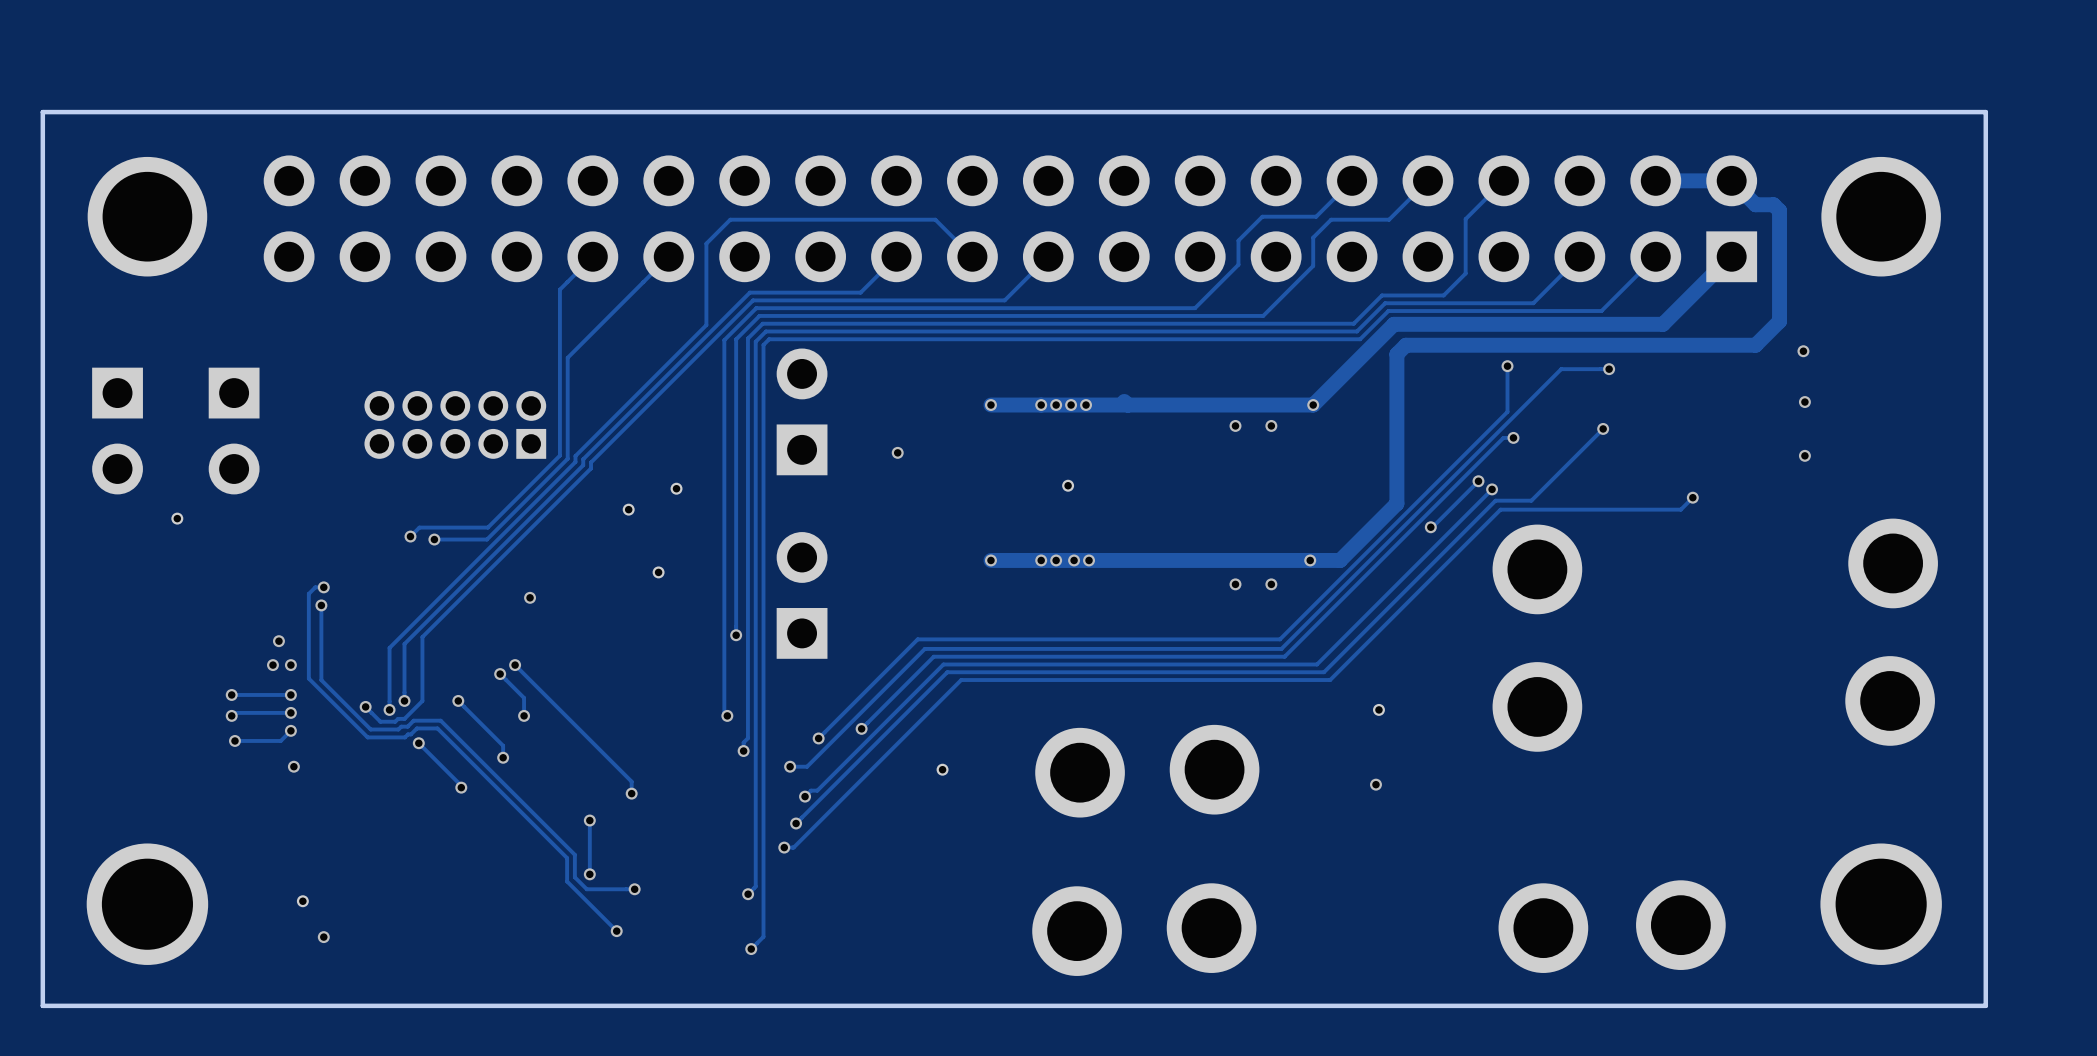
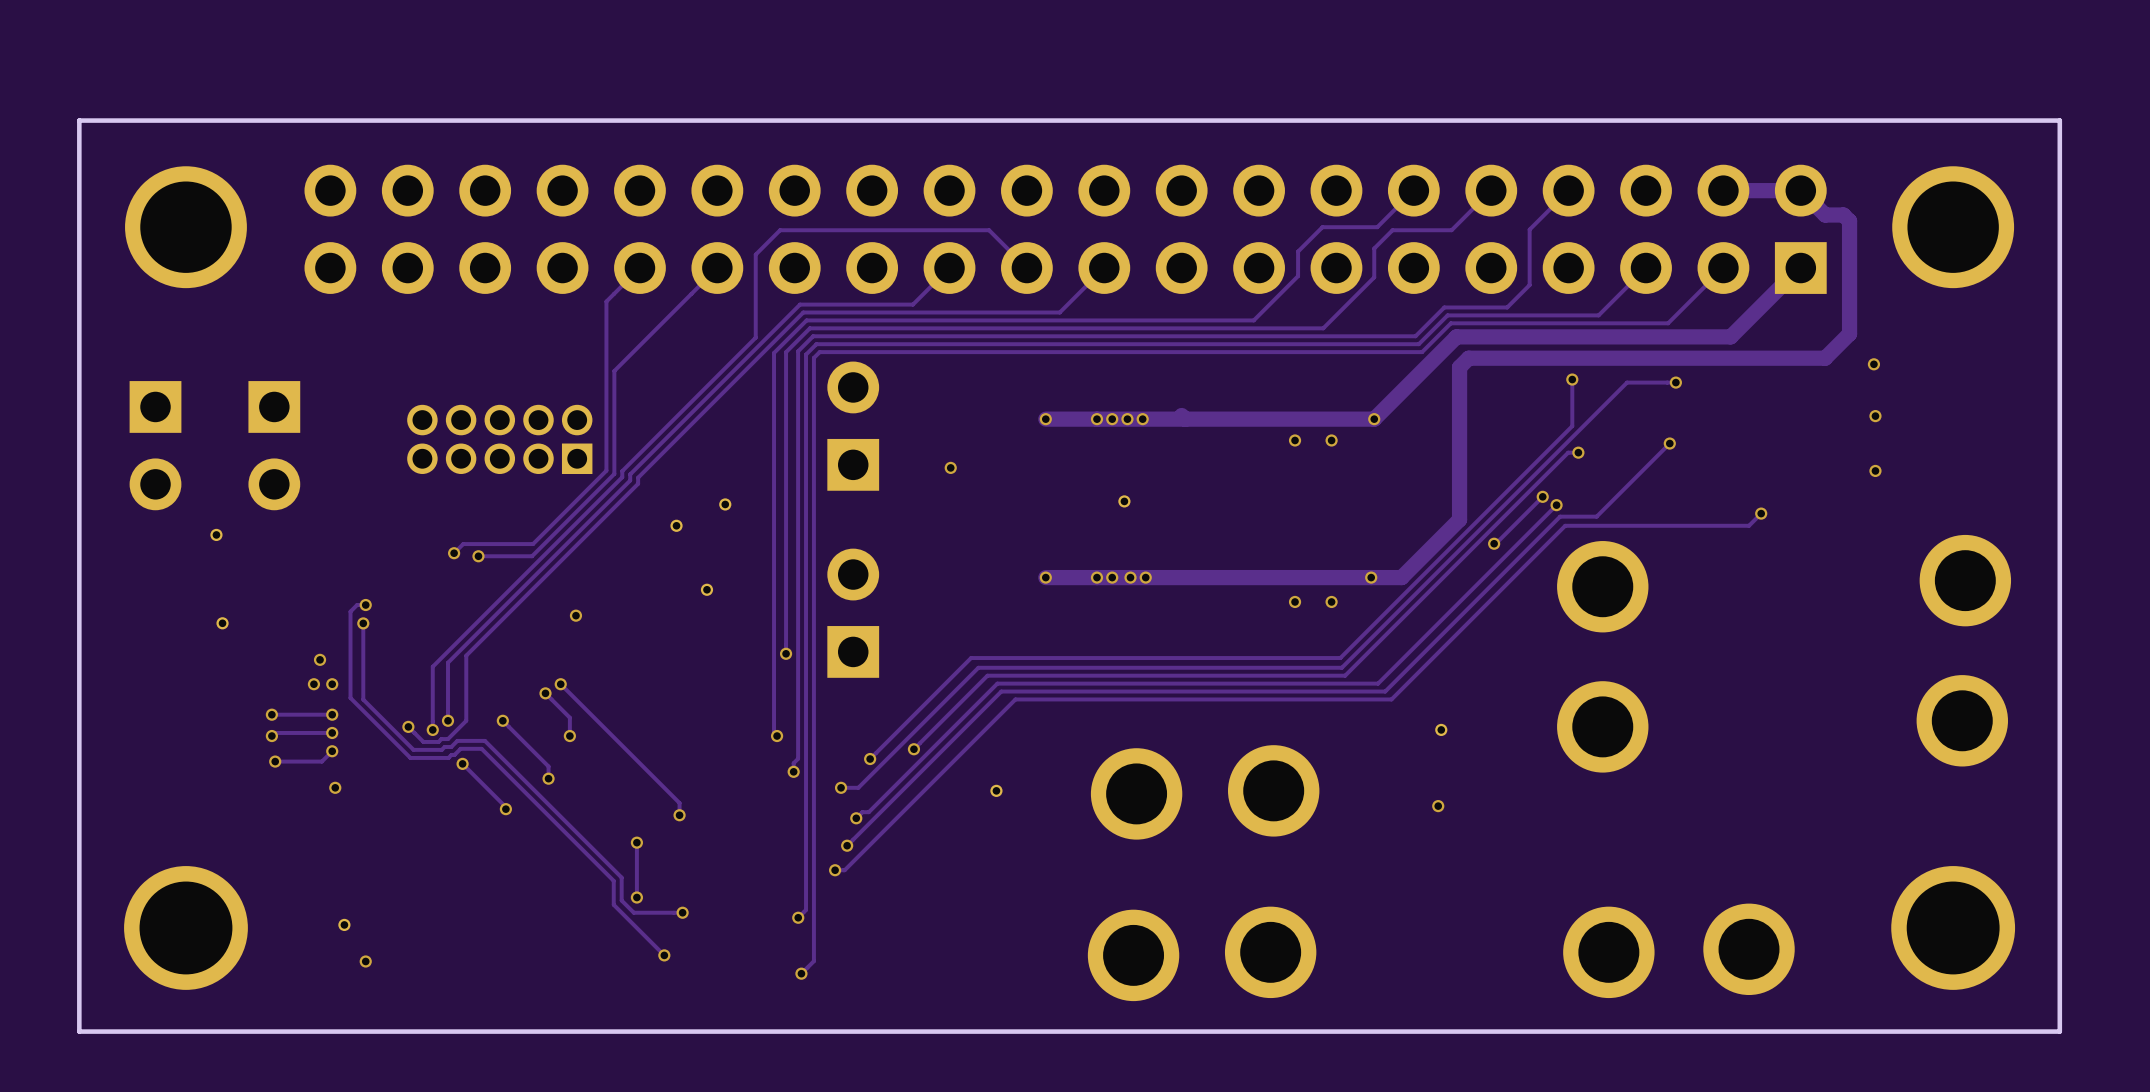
part: none -> (222, 623)

